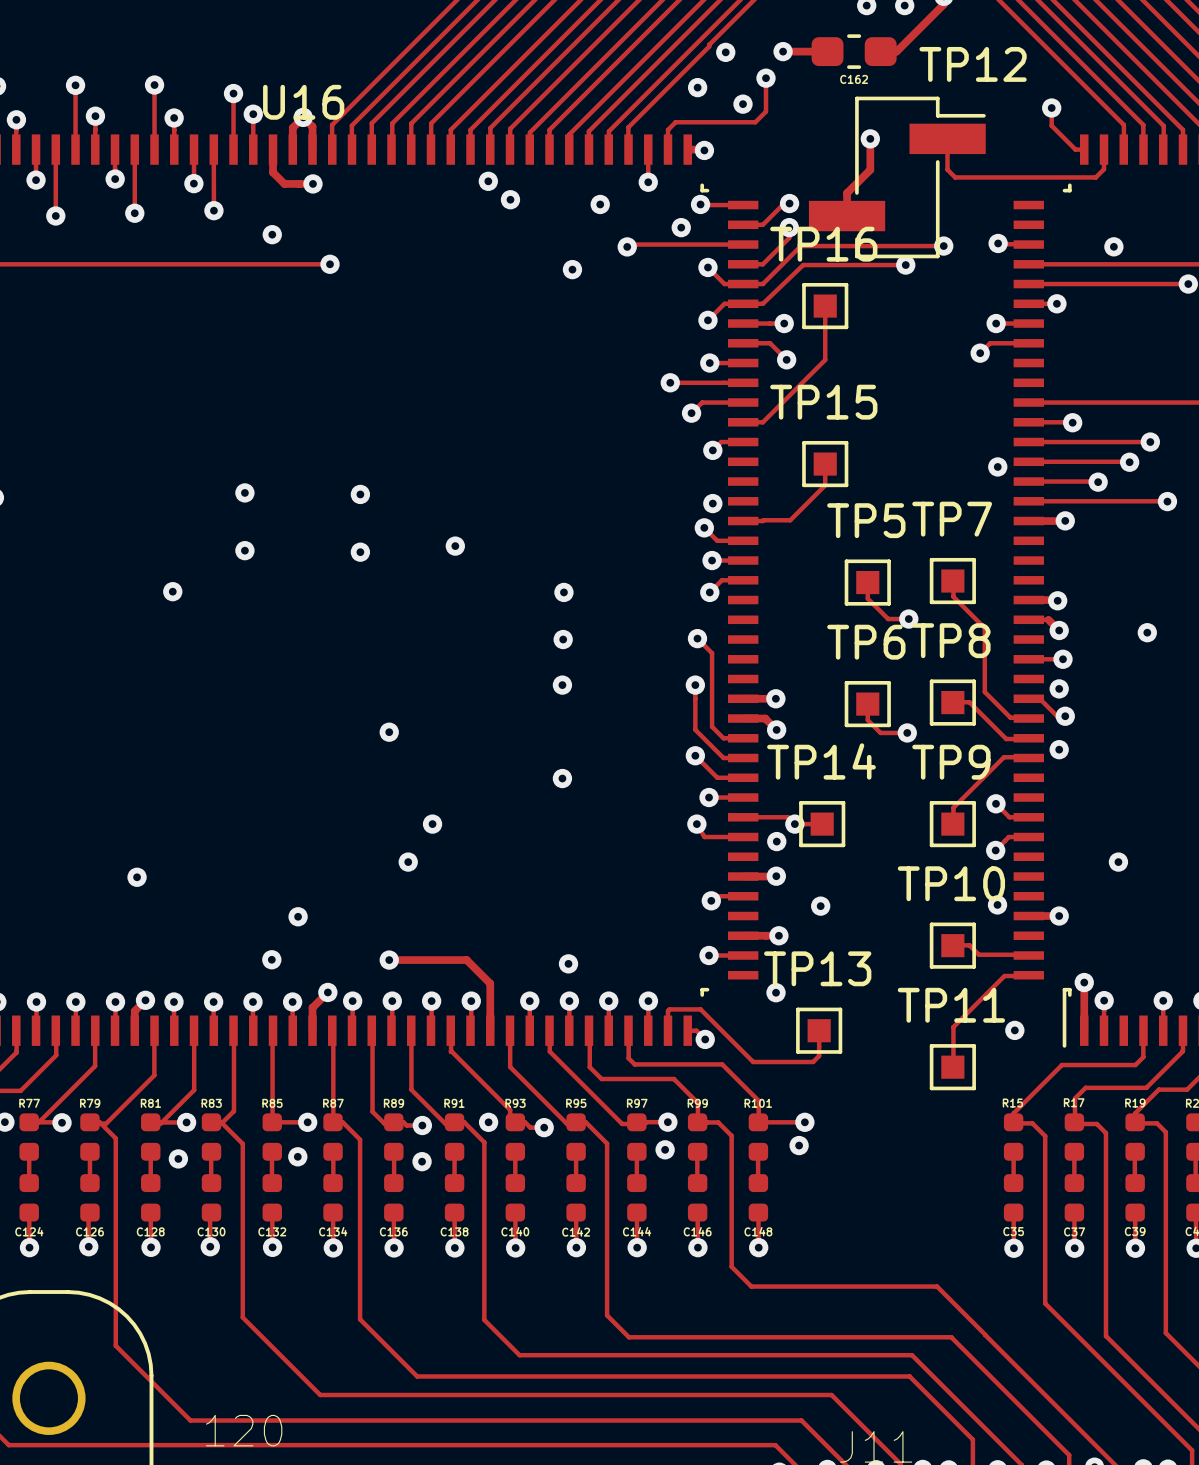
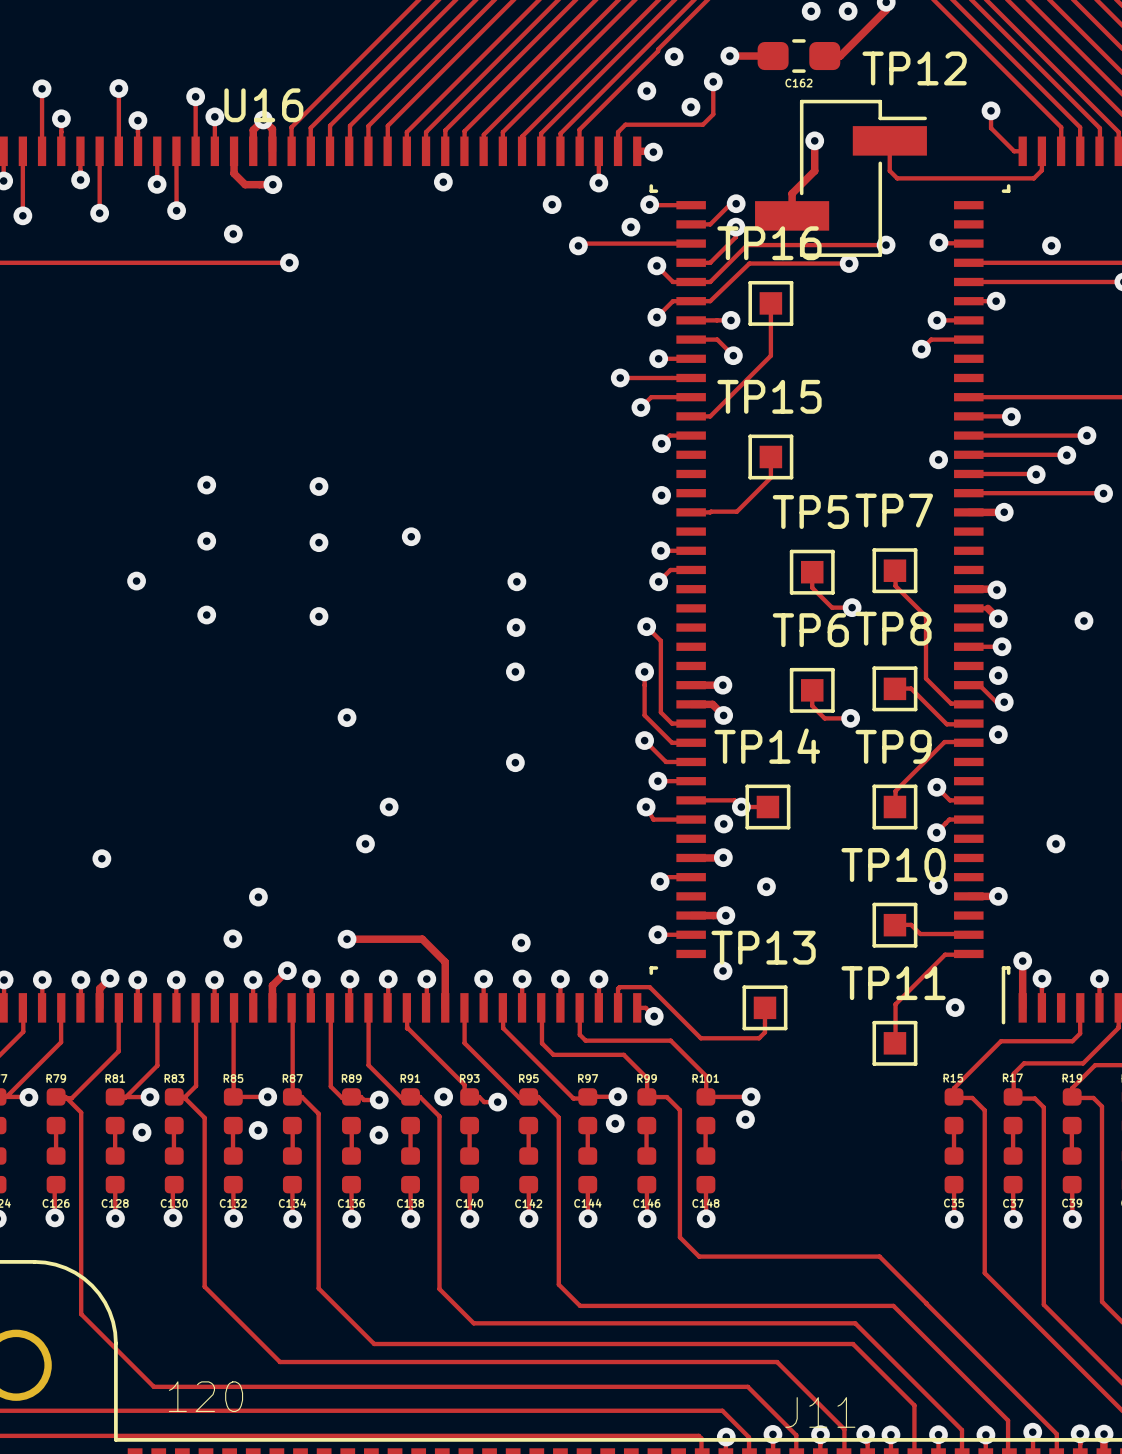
via: (510, 199) -> none
via: (572, 269) -> none
track: (704, 527) (717, 540) (743, 540) -> none
via: (704, 527) -> none
via: none -> (206, 615)
via: none -> (318, 616)

